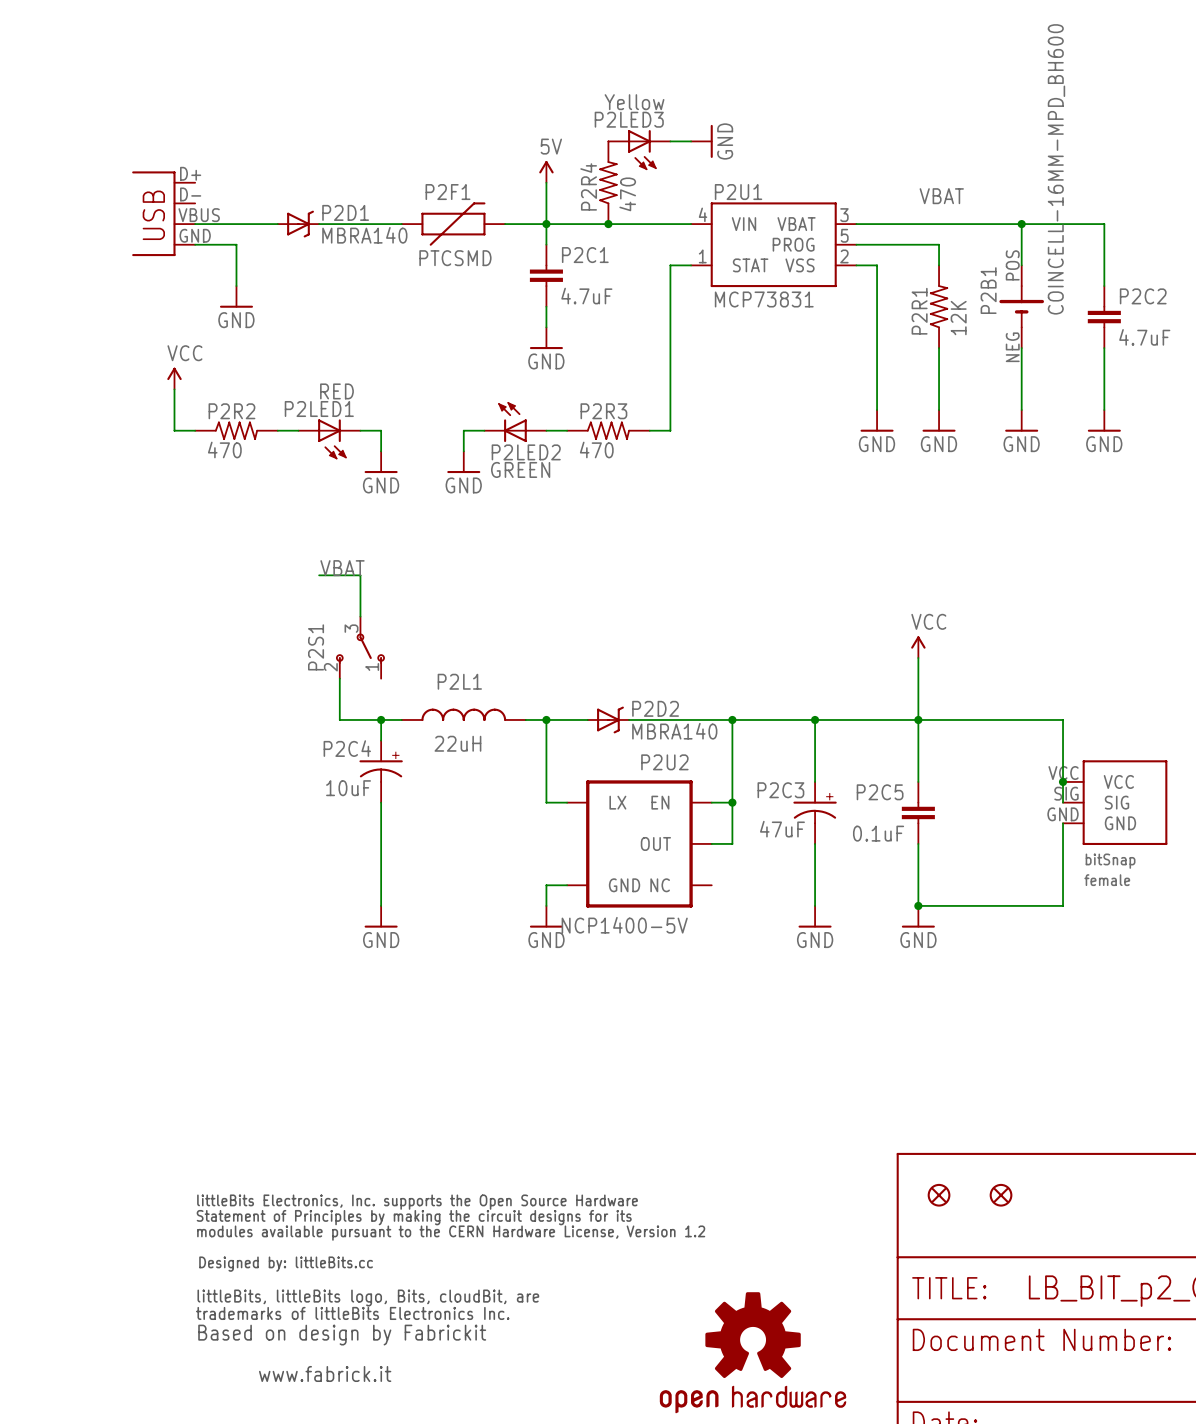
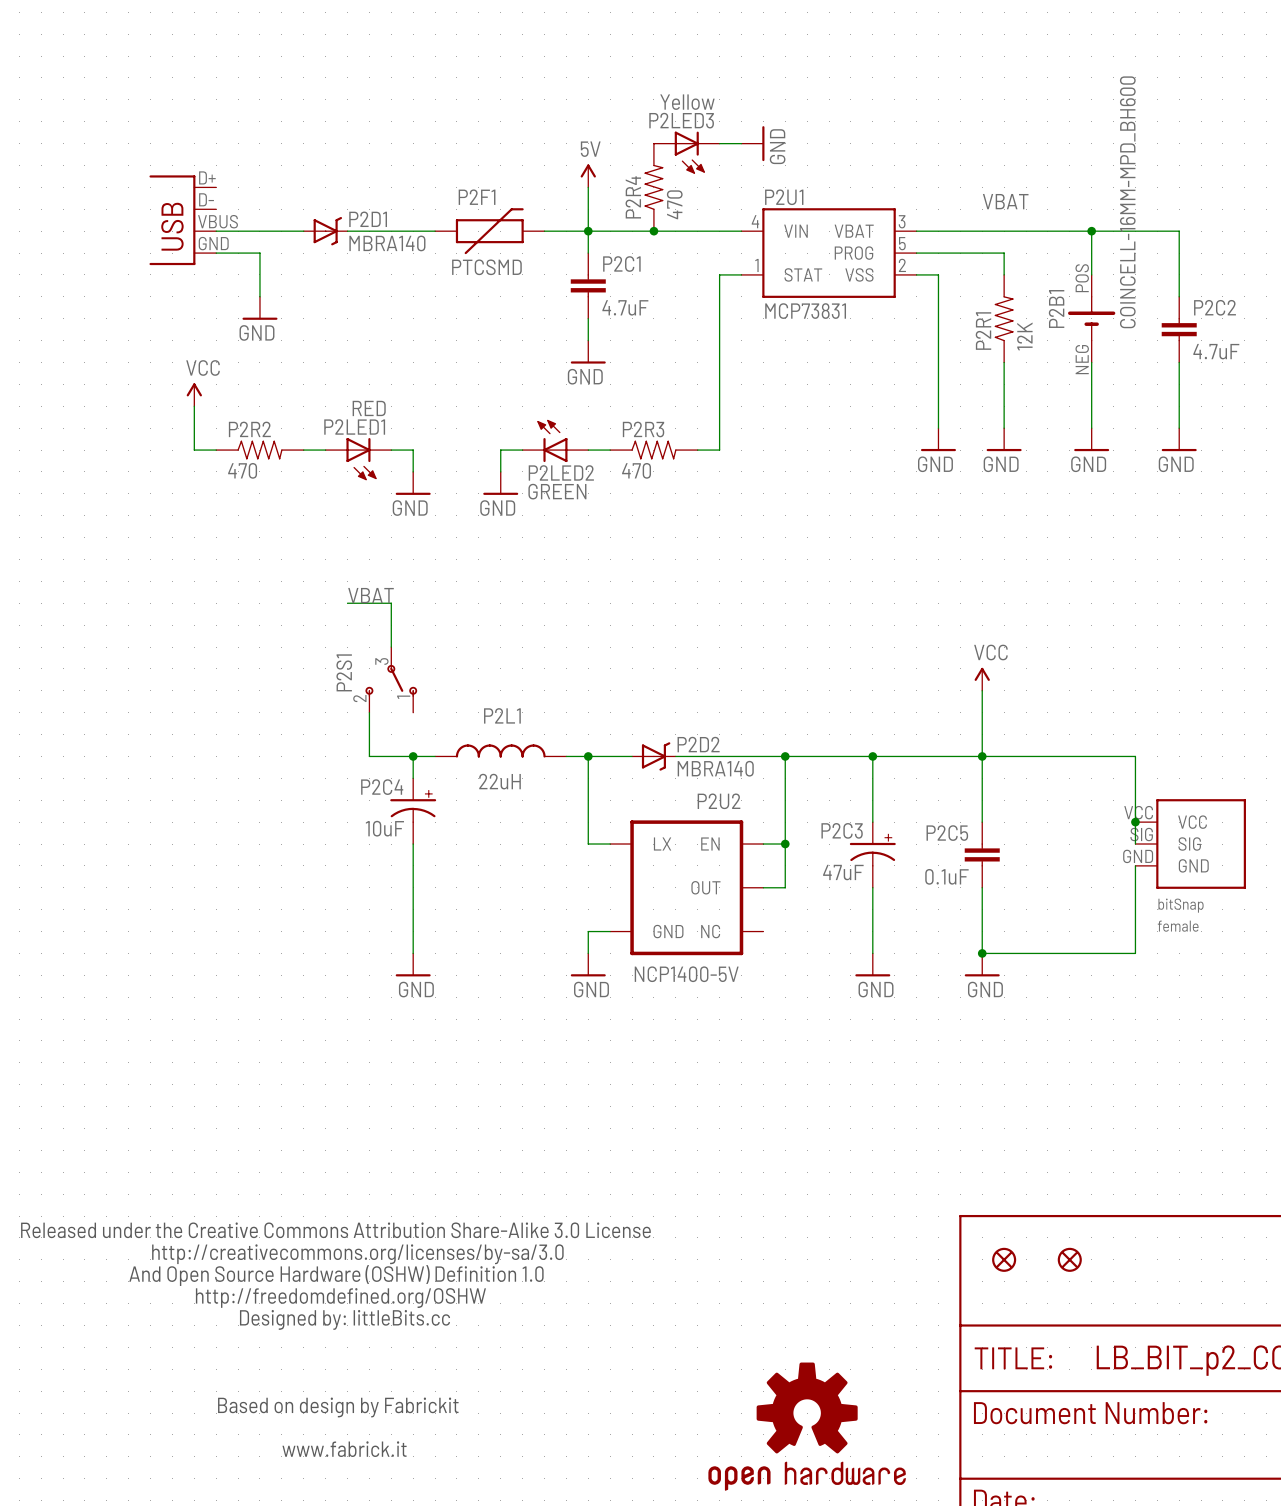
part: none -> (335, 1276)
part: (450, 1257) -> none

